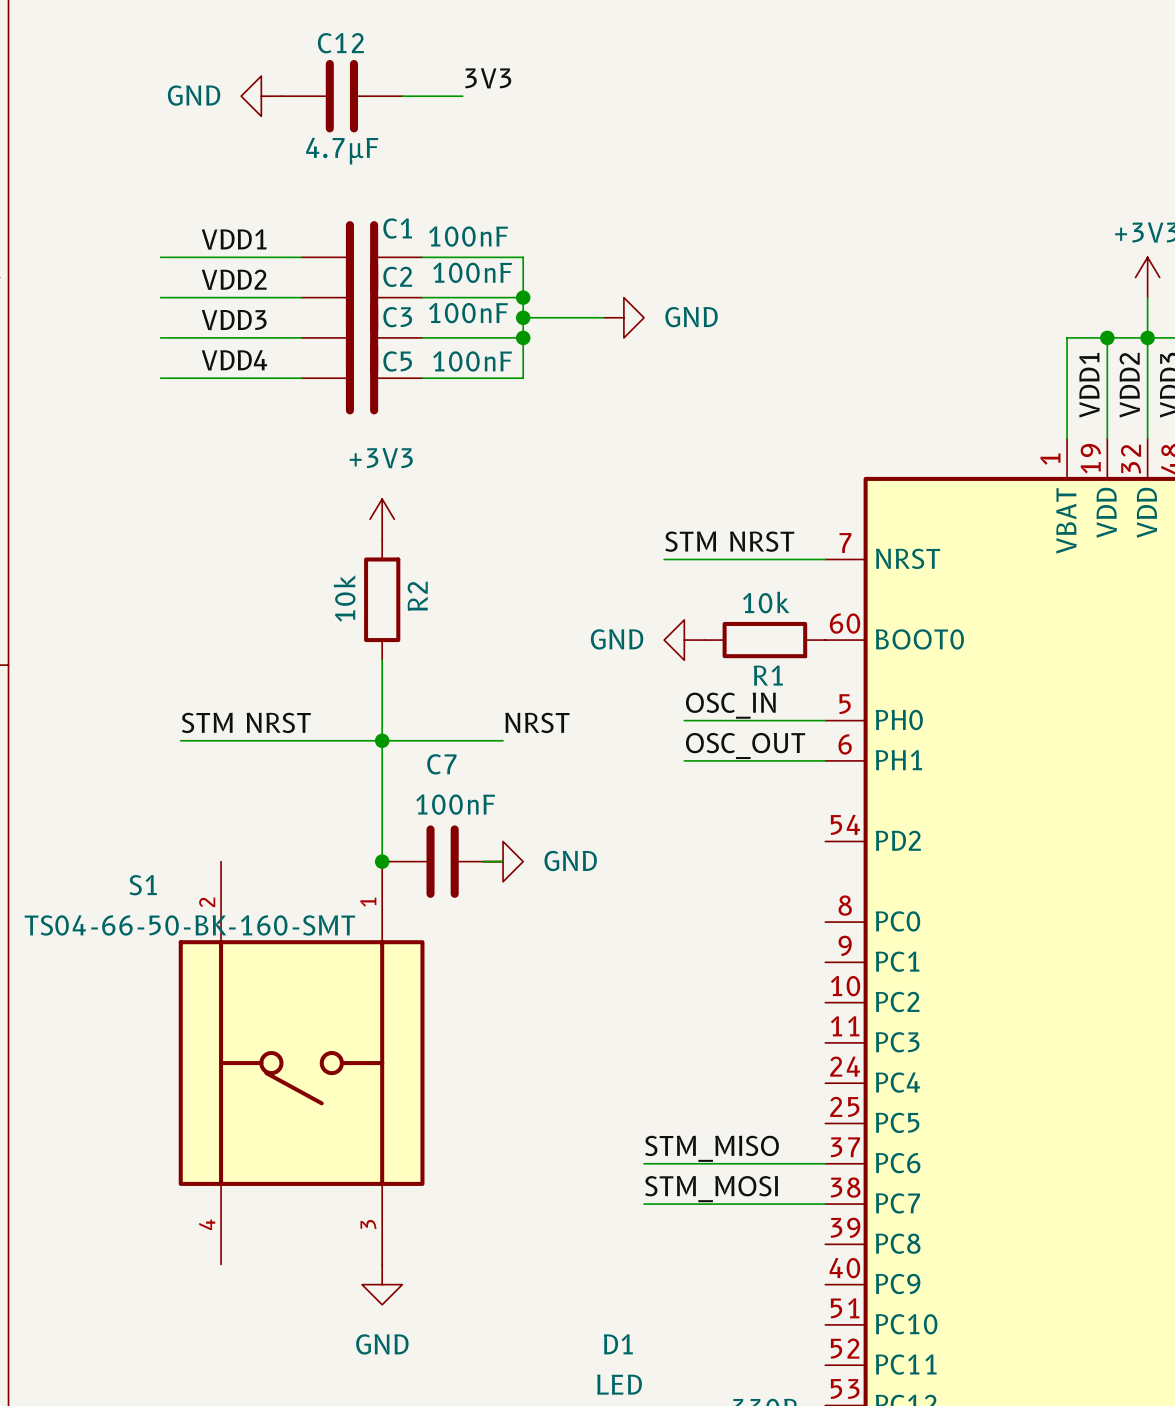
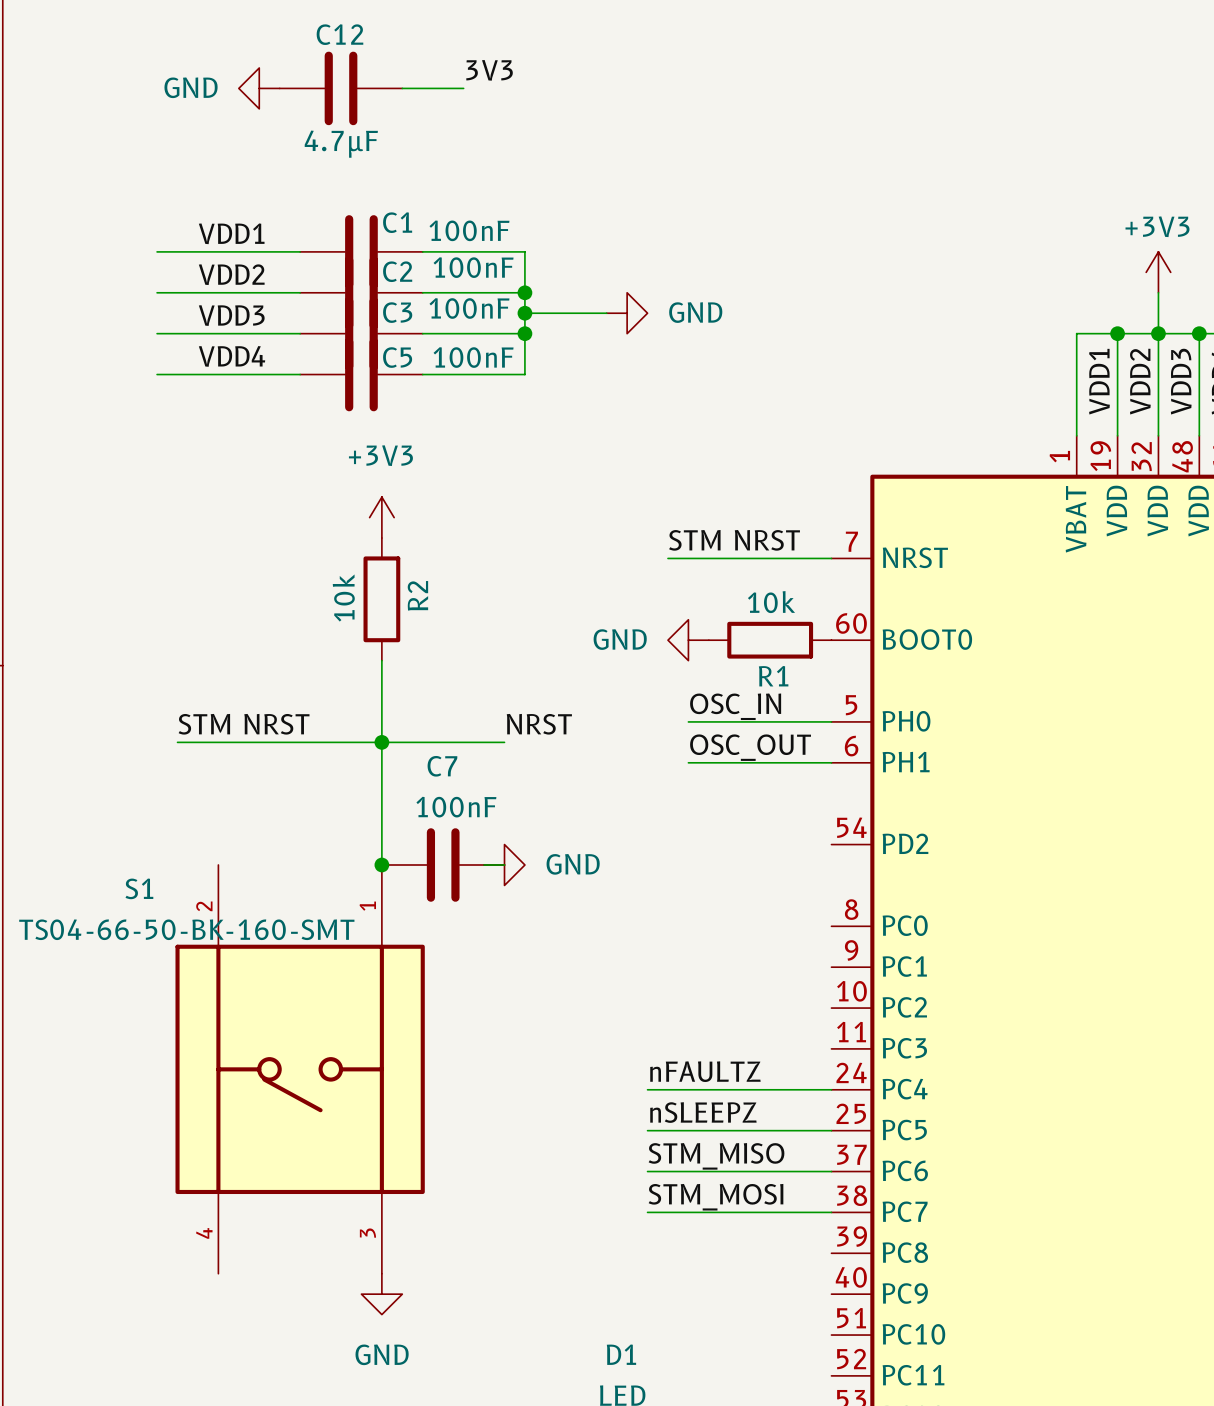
label: none -> nFAULTZ (705, 1071)
wire: none -> (647, 1089) (831, 1089)
label: none -> nSLEEPZ (703, 1112)
wire: none -> (647, 1130) (831, 1130)

